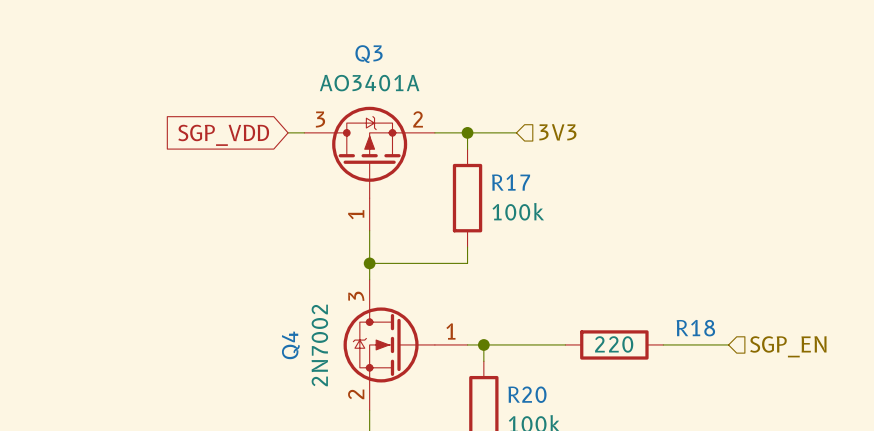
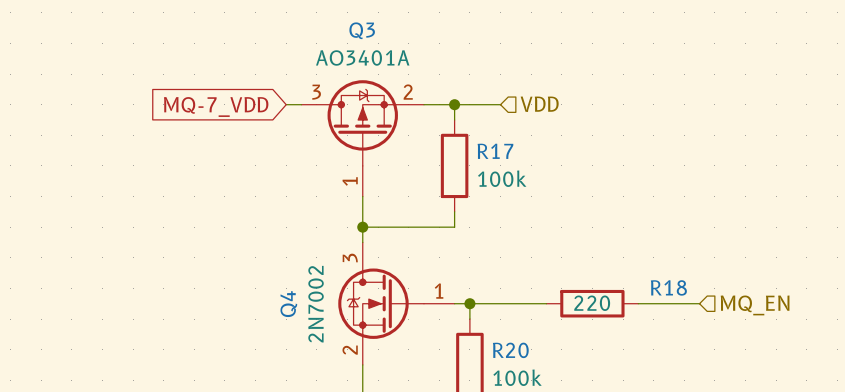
hierarchical label: 3V3 (557, 132) -> VDD (539, 104)
global label: SGP_VDD (223, 135) -> MQ-7_VDD (216, 106)
hierarchical label: SGP_EN (788, 346) -> MQ_EN (755, 305)

